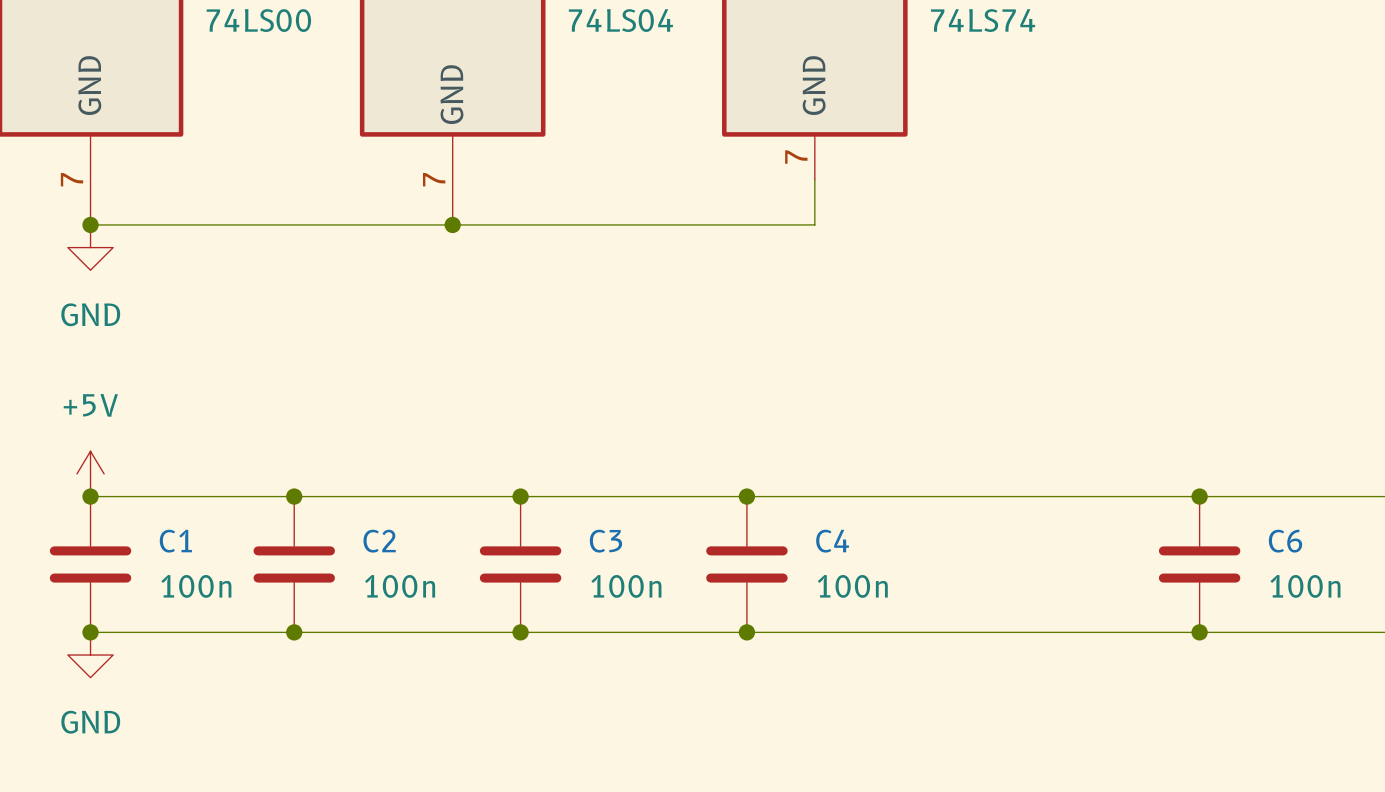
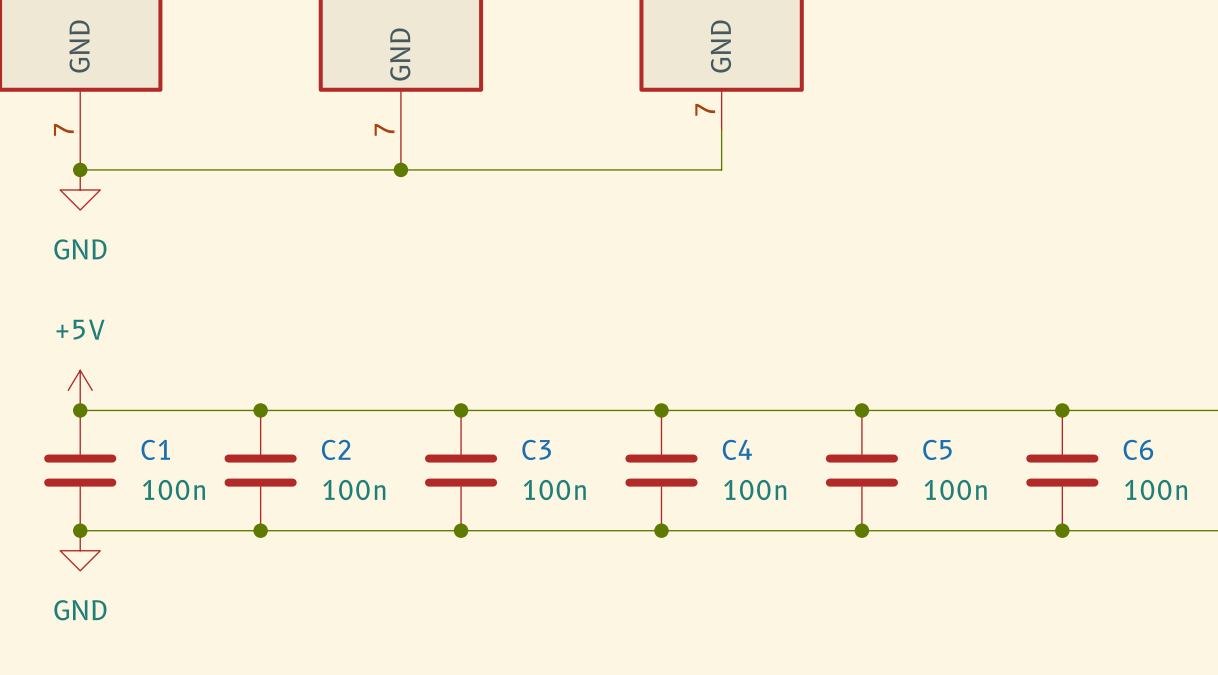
junction: none -> (861, 410)
C5: none -> 100n (861, 470)
junction: none -> (861, 530)

